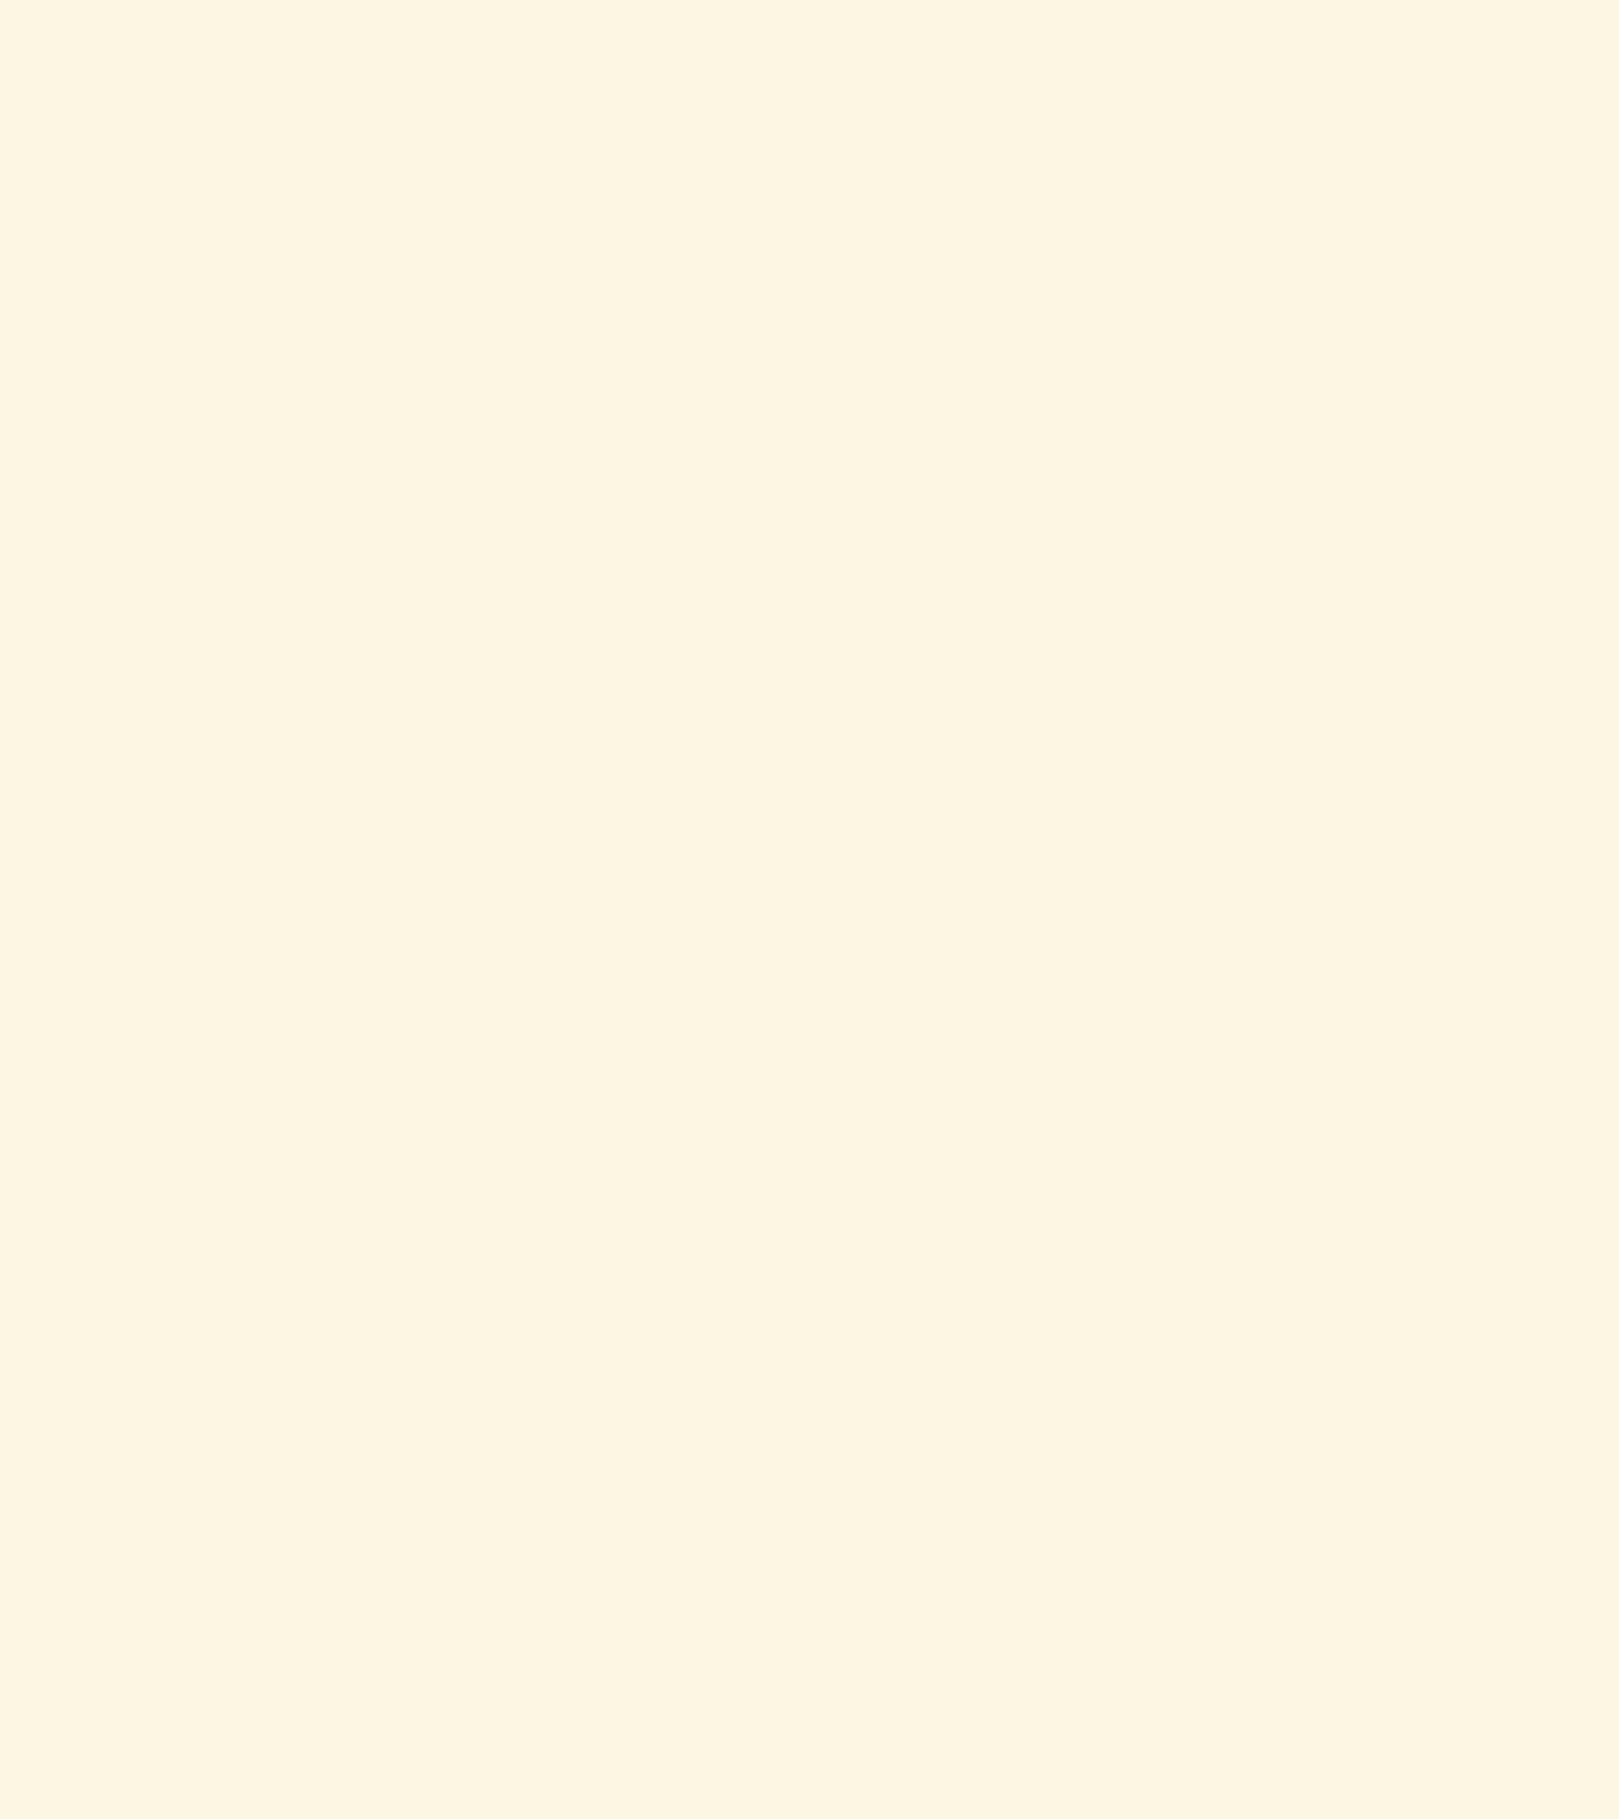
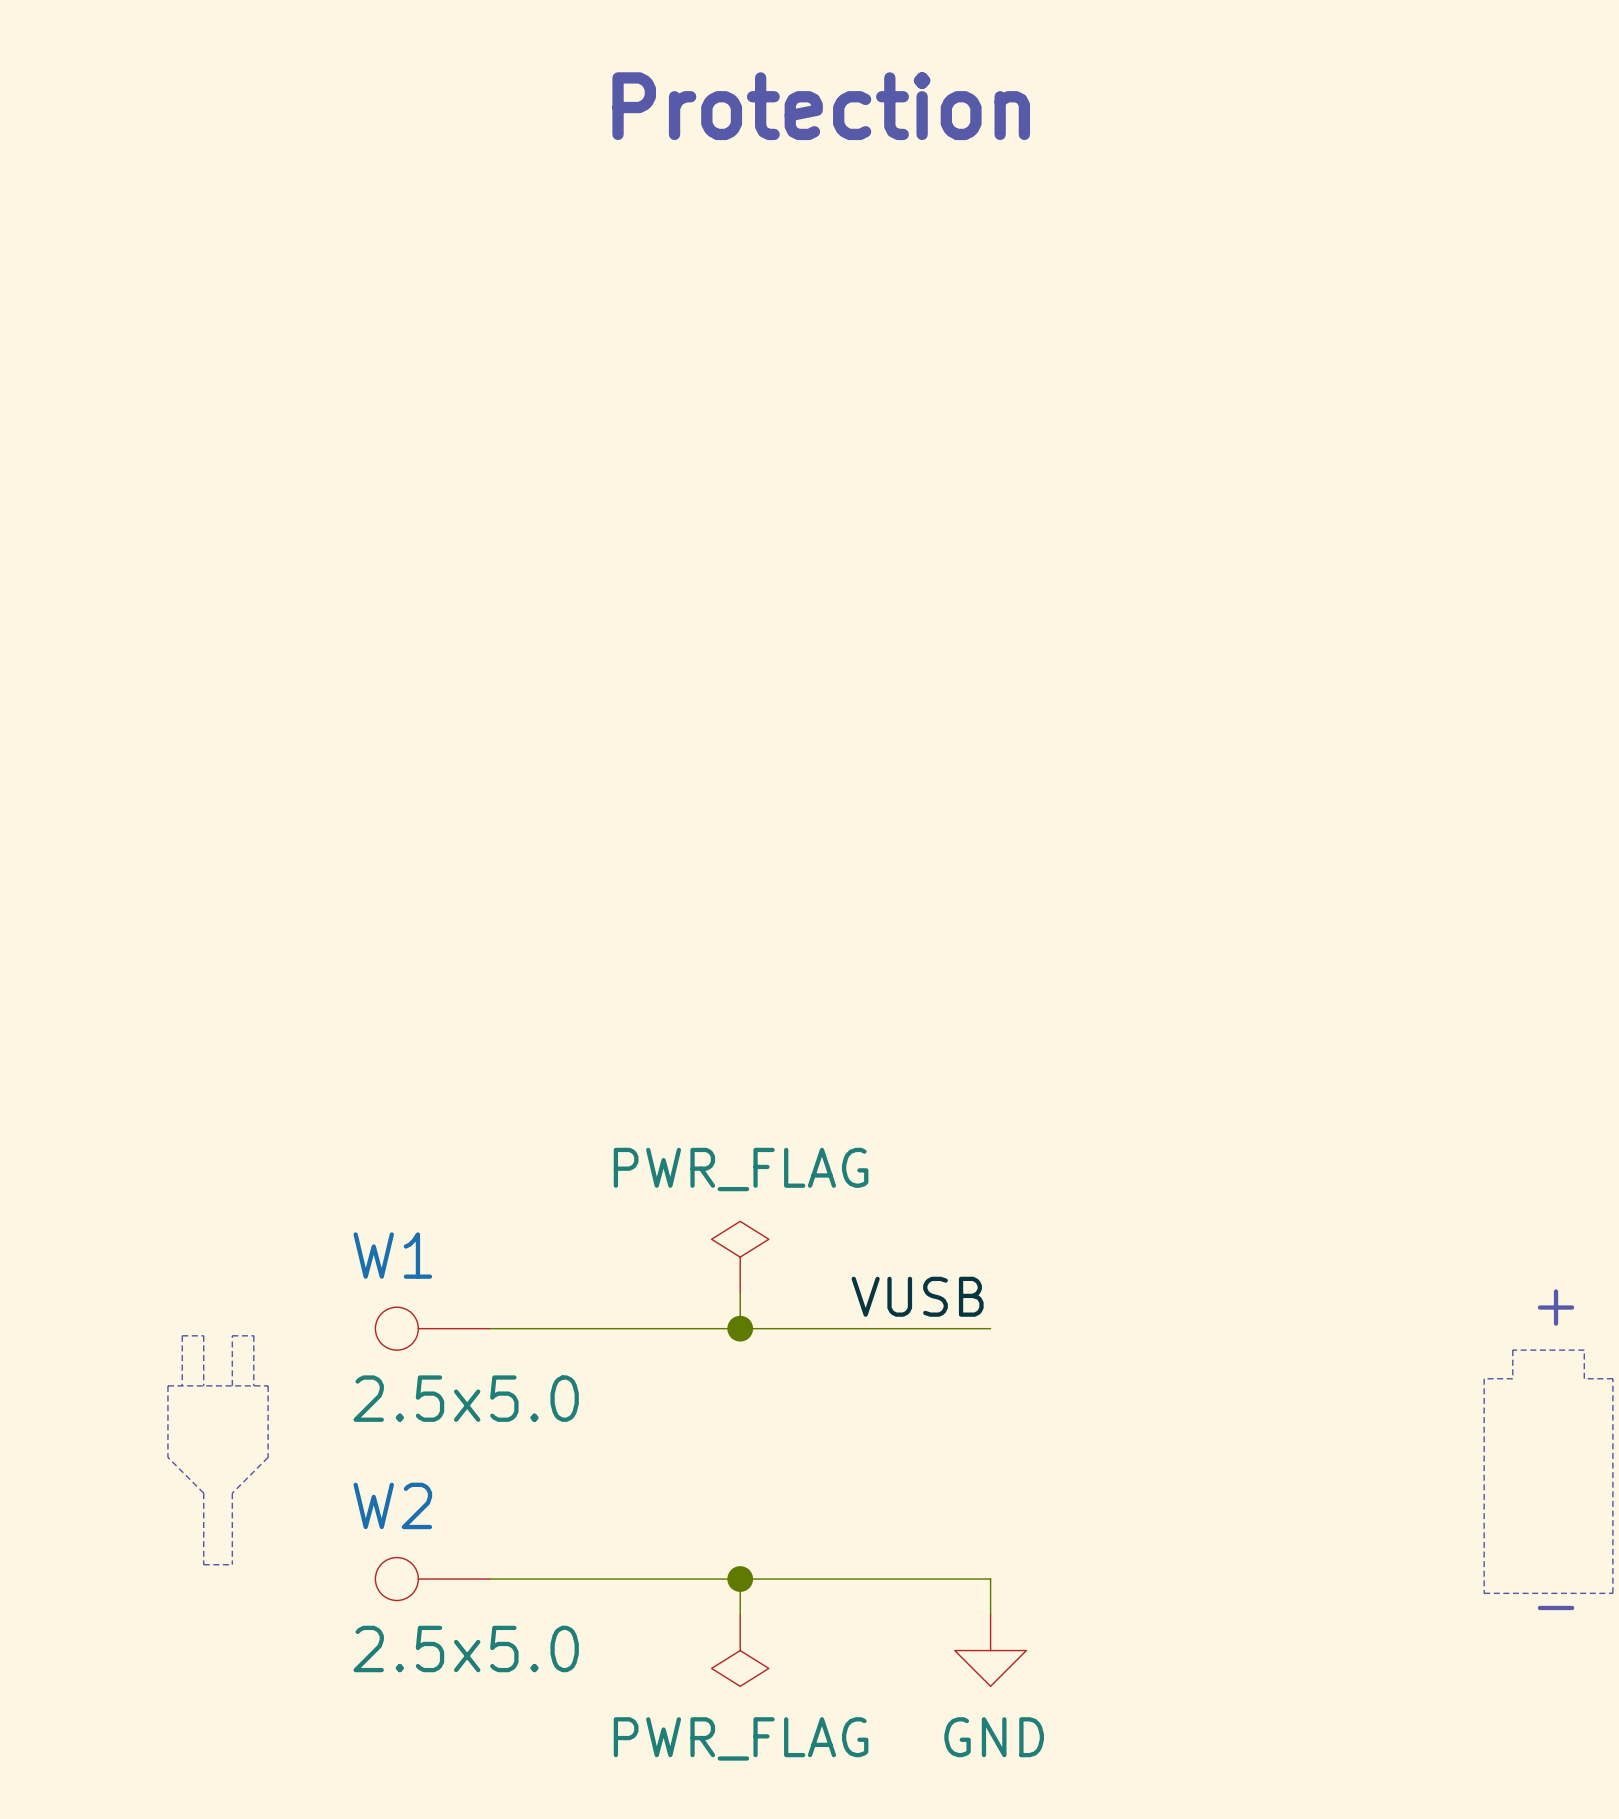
text: none -> Protection (821, 106)
power symbol: none -> PWR_FLAG (740, 1257)
wire: none -> (740, 1292) (740, 1328)
label: none -> VUSB (917, 1296)
text: none -> + (1556, 1307)
W1: none -> 2.5x5.0 (432, 1328)
wire: none -> (489, 1328) (990, 1328)
junction: none -> (740, 1328)
line: none -> (1512, 1350) (1584, 1350) (1584, 1378) (1612, 1378) (1612, 1593) (1484, 1593) (1484, 1378) (1512, 1378) (1512, 1350)
line: none -> (167, 1385) (167, 1457) (203, 1493) (203, 1564) (232, 1564) (232, 1493) (268, 1457) (268, 1385) (167, 1385)
line: none -> (182, 1385) (182, 1335) (203, 1335) (203, 1385)
line: none -> (232, 1385) (232, 1335) (253, 1335) (253, 1385)
W2: none -> 2.5x5.0 (432, 1579)
wire: none -> (489, 1579) (990, 1579) (990, 1614)
wire: none -> (740, 1579) (740, 1614)
junction: none -> (740, 1579)
text: none -> - (1556, 1607)
power symbol: none -> PWR_FLAG (740, 1650)
power symbol: none -> GND (990, 1650)

